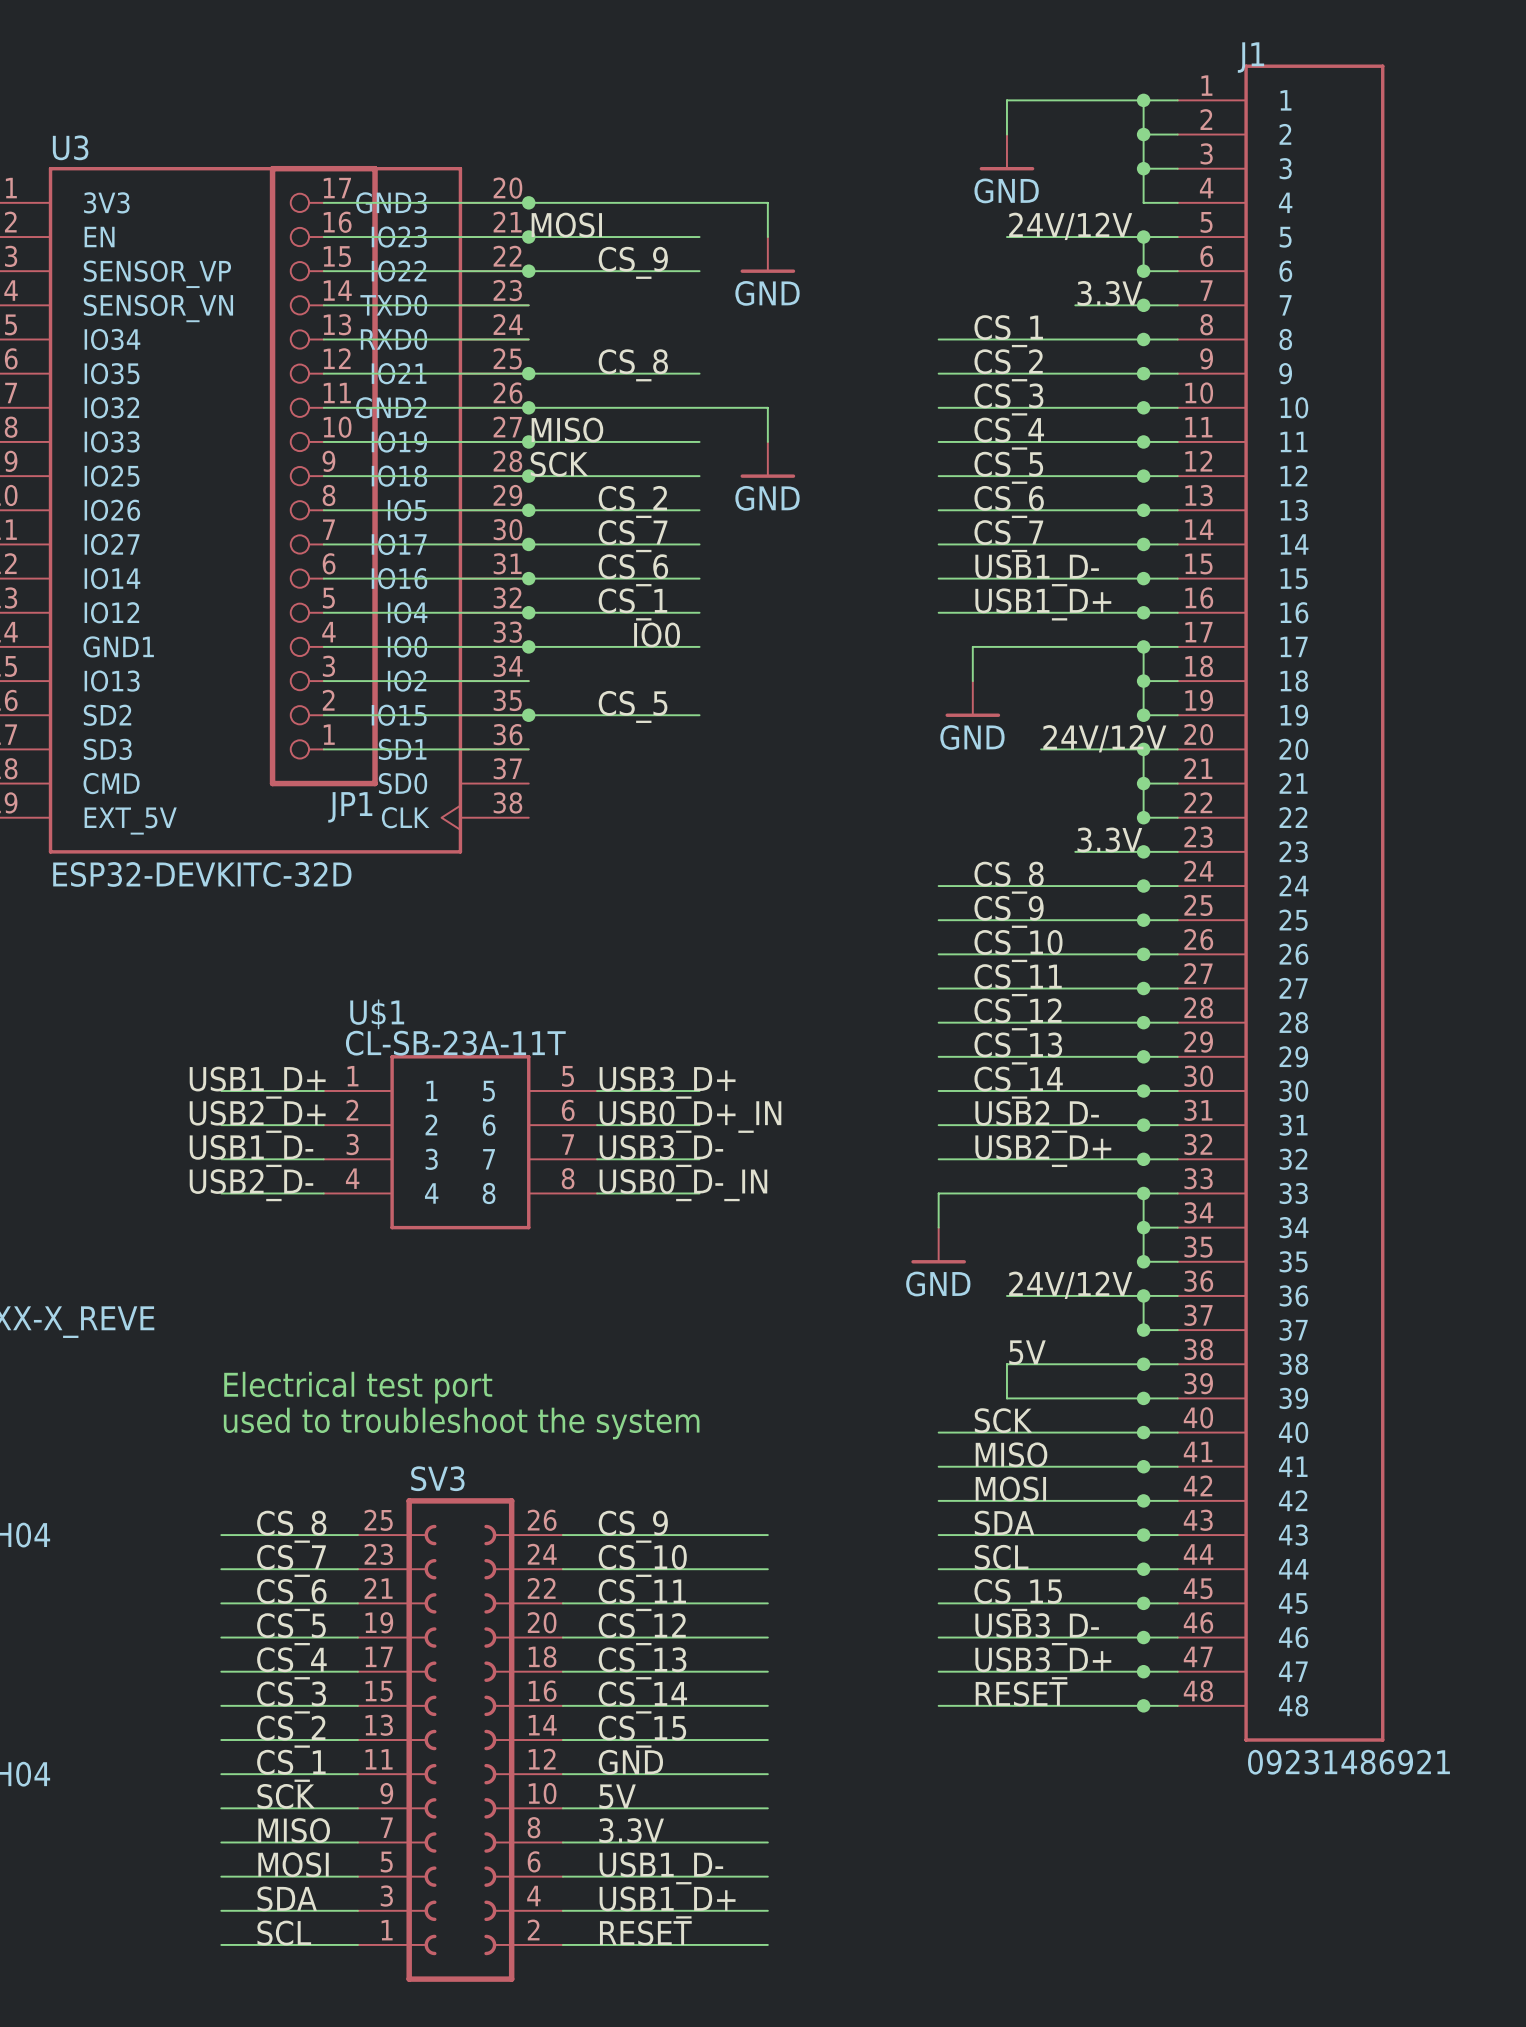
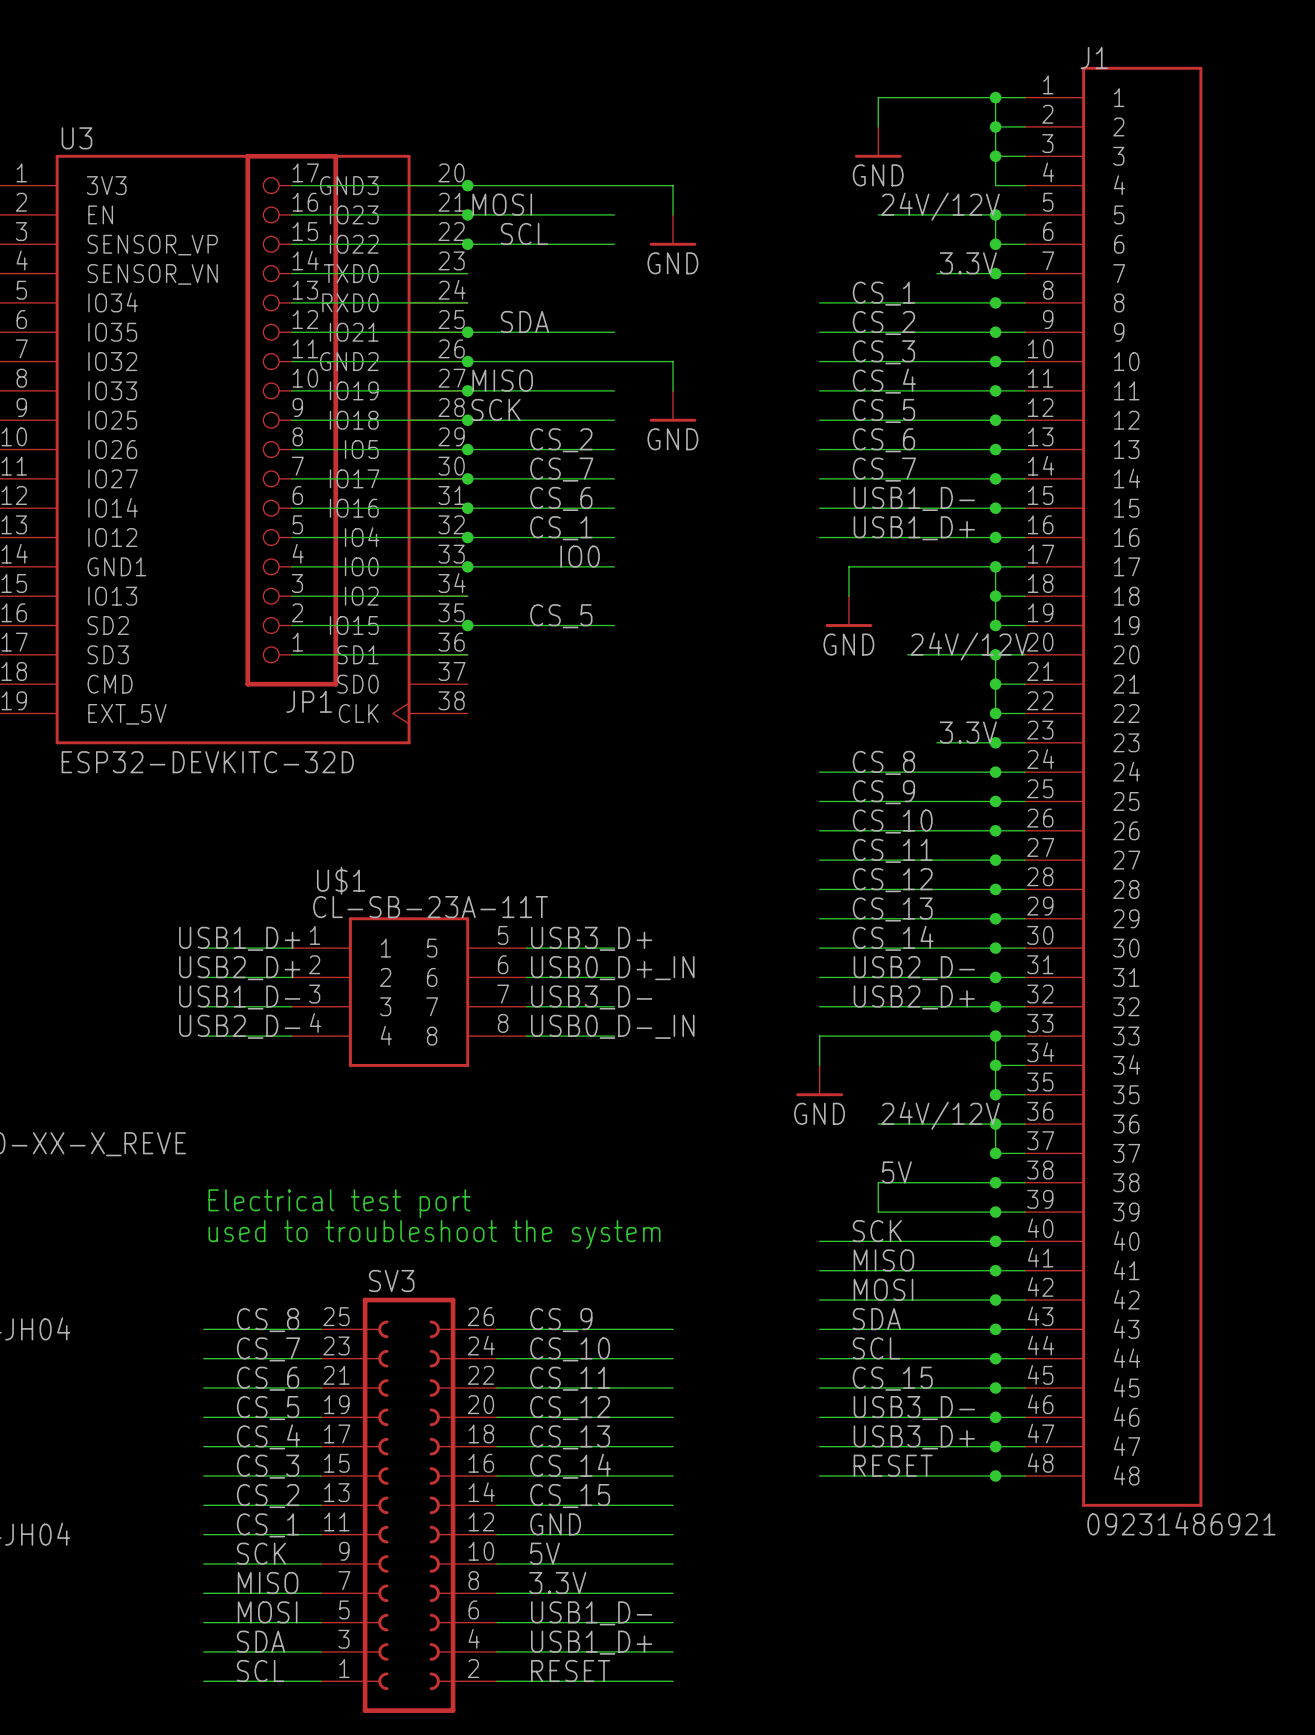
label: none -> SCL (524, 234)
label: CS_9 (633, 262) -> none
label: none -> SDA (524, 321)
label: CS_8 (633, 365) -> none

